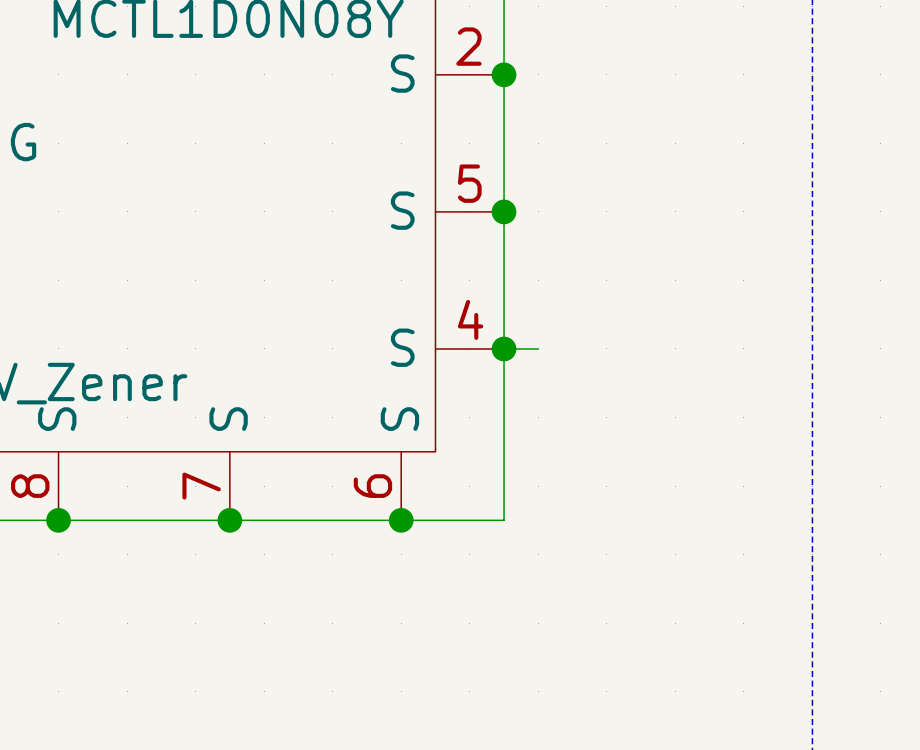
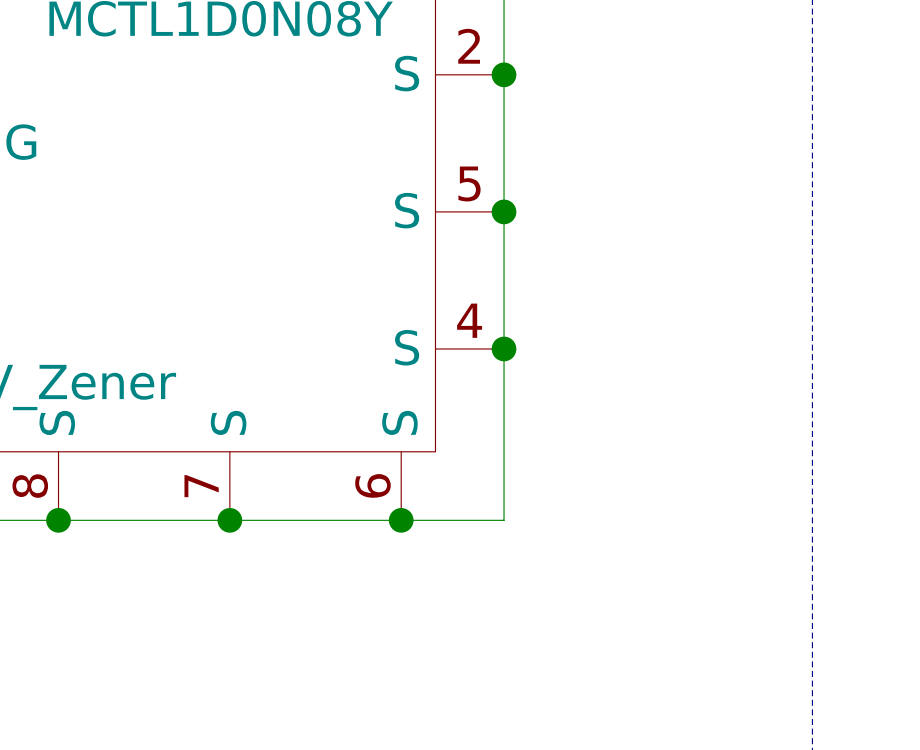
wire: (504, 348) (538, 348) -> none

